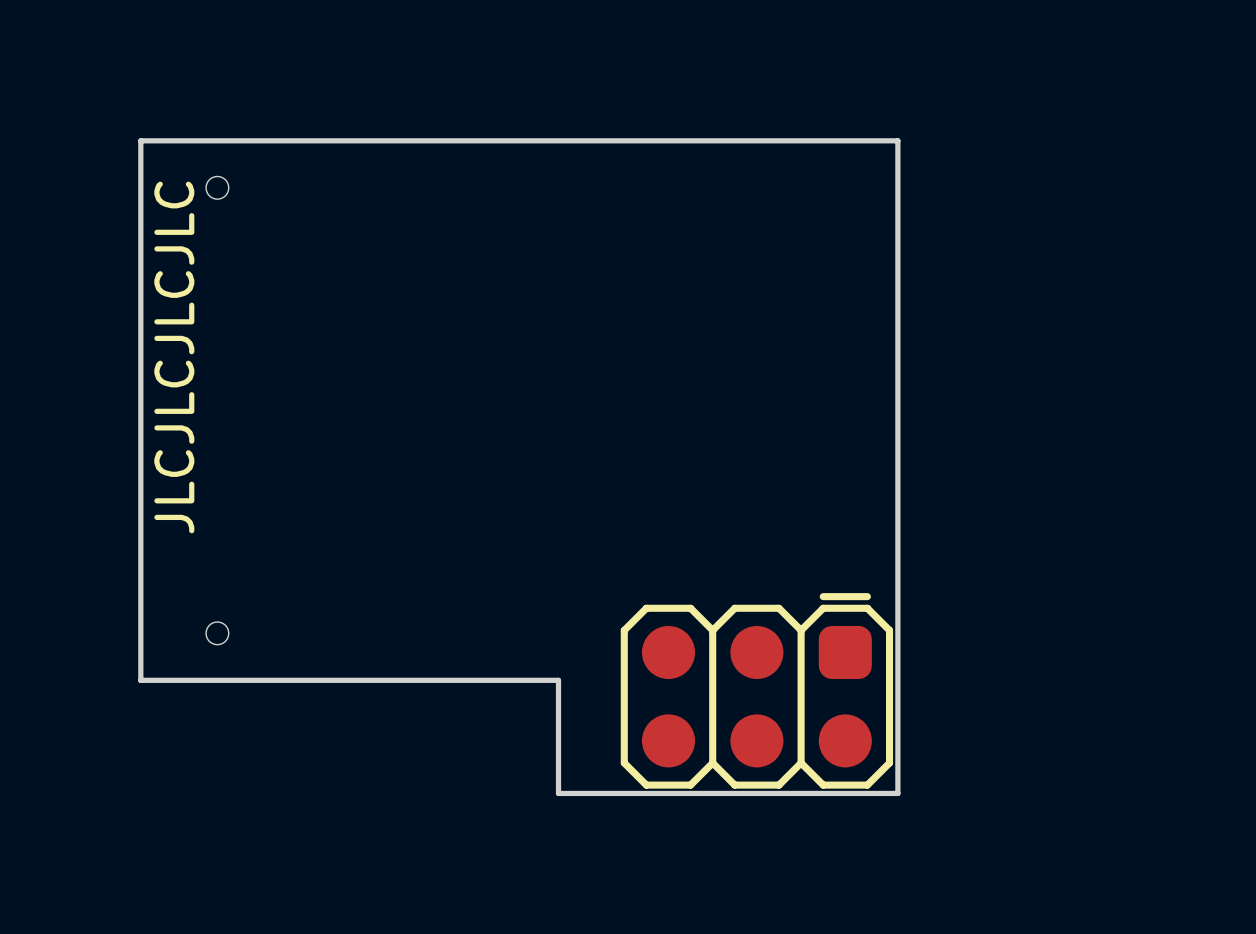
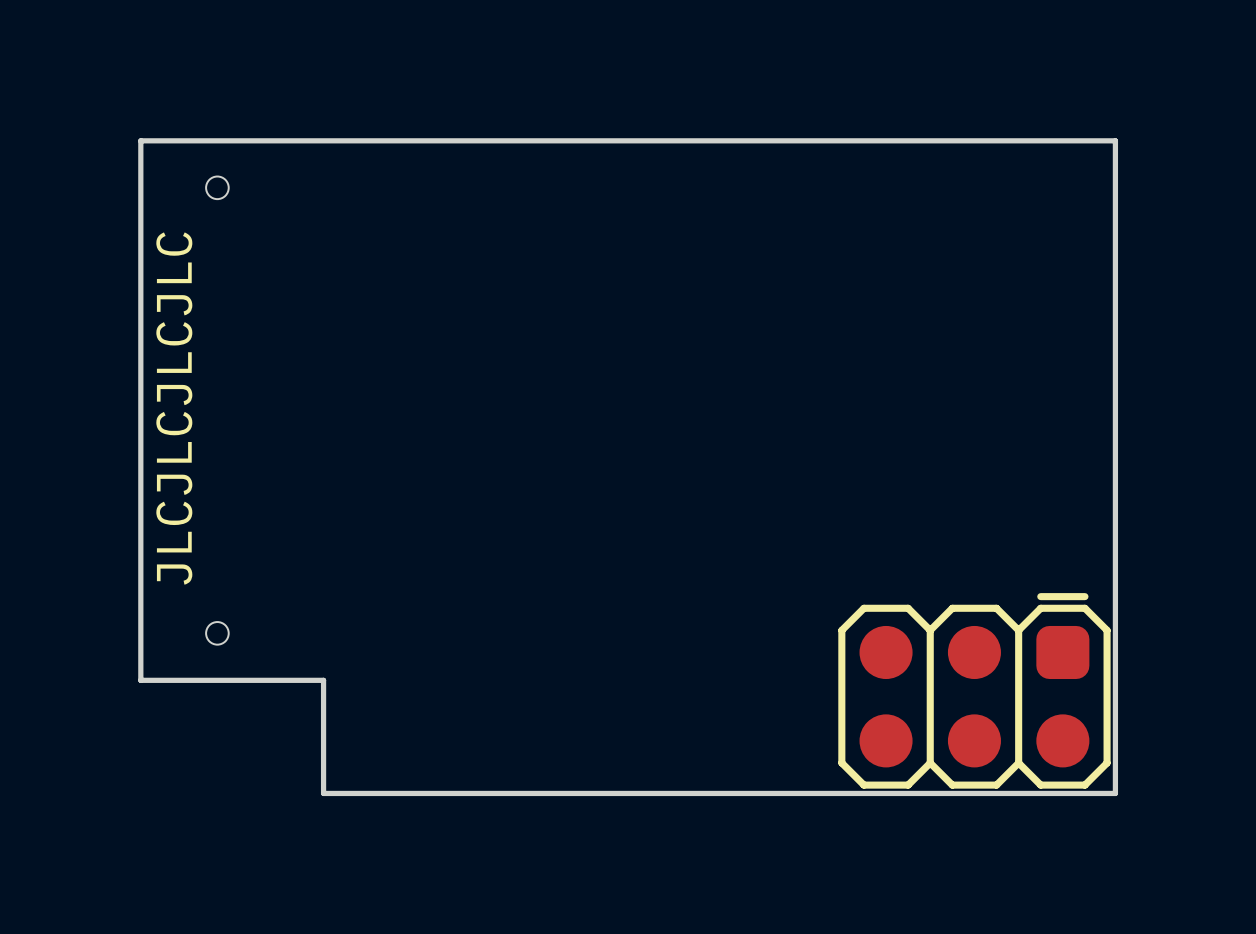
board edge: (897, 140) (897, 793) -> (897, 140) (1115, 140) (1115, 793) (897, 793)
text position: JLCJLCJLCJLC (174, 357) -> JLCJLCJLCJLC (174, 408)
board edge: (323, 680) (558, 680) (558, 793) -> (323, 680) (323, 793) (558, 793)
part position: (756, 690) -> (974, 690)

